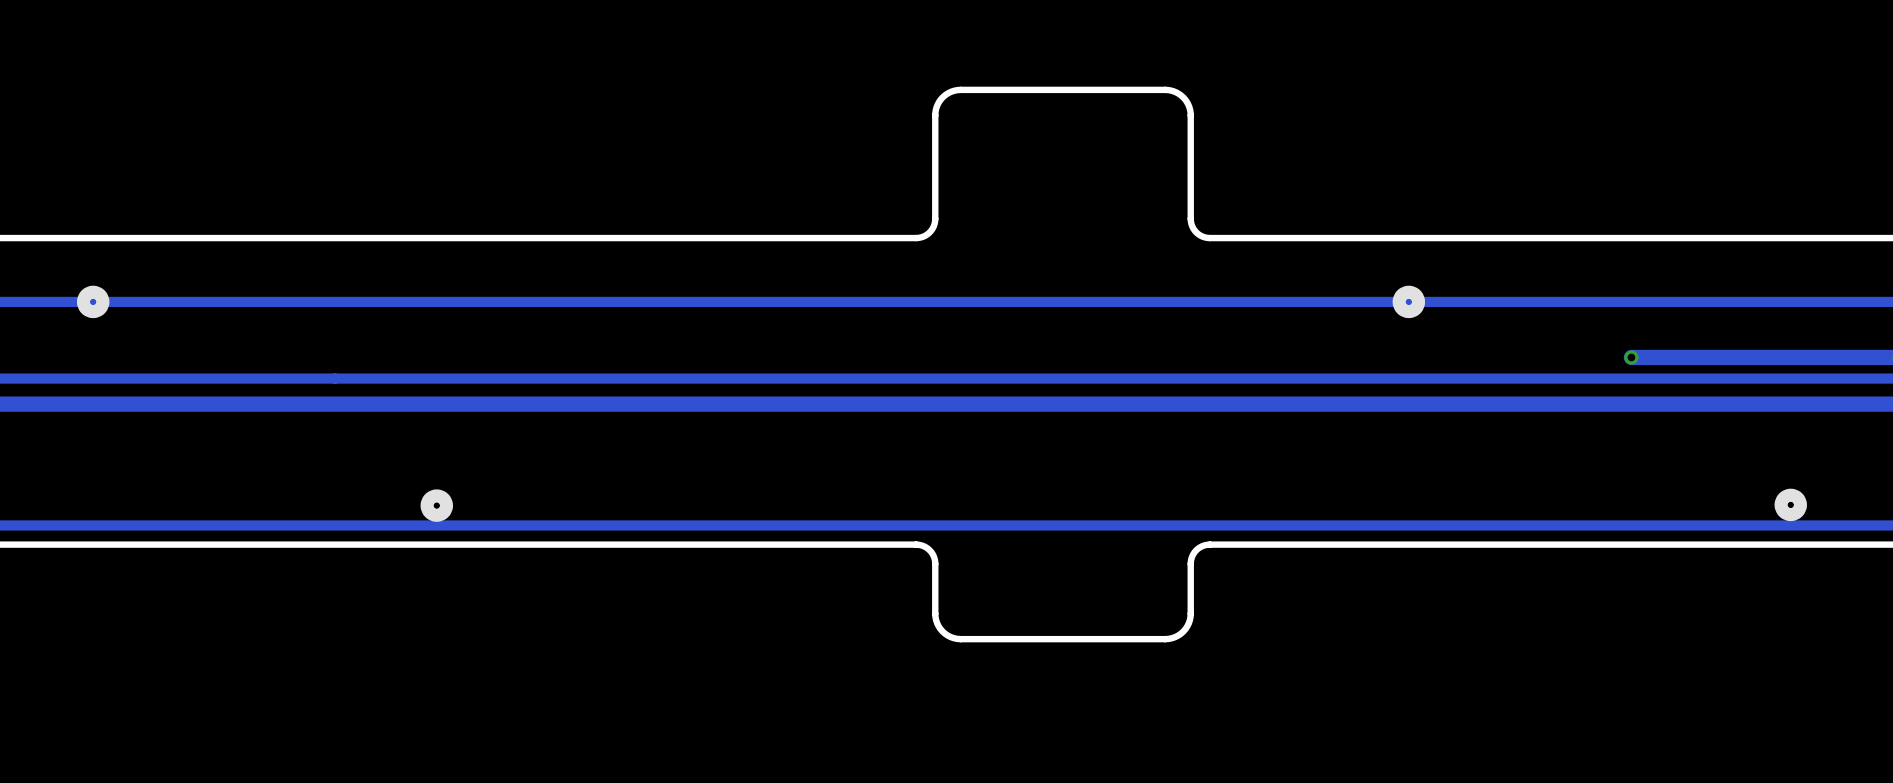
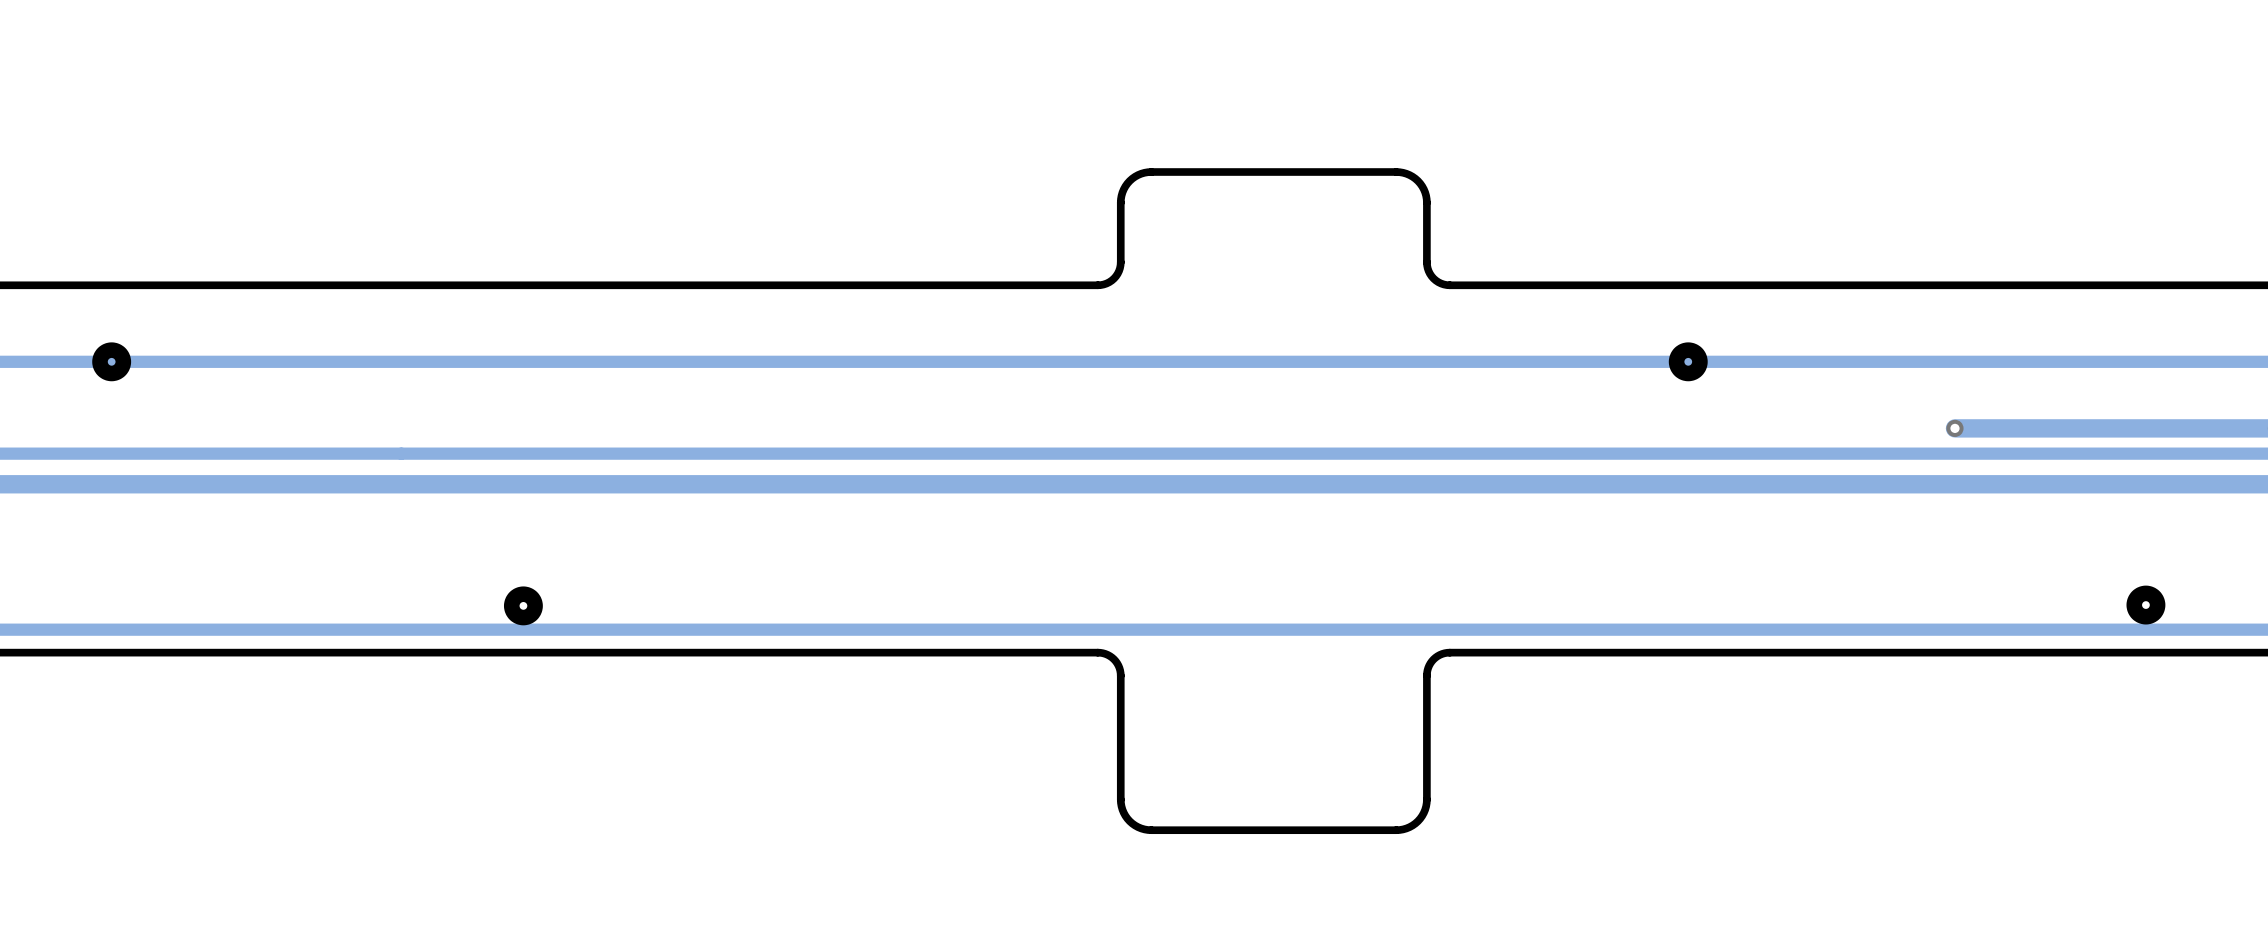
board edge: (1190, 169) (1189, 107) (1178, 93) (1165, 89) (952, 91) (940, 99) (935, 109) (935, 169) -> (1426, 202) (1425, 192) (1417, 180) (1409, 175) (1396, 172) (1147, 172) (1138, 175) (1127, 183) (1122, 192) (1120, 202)
board edge: (1190, 613) (1188, 623) (1183, 631) (1174, 637) (1165, 639) (957, 638) (948, 635) (940, 629) (935, 613) -> (1426, 735) (1425, 809) (1415, 823) (1406, 828) (1396, 830) (1151, 830) (1141, 828) (1127, 818) (1121, 806) (1120, 735)

